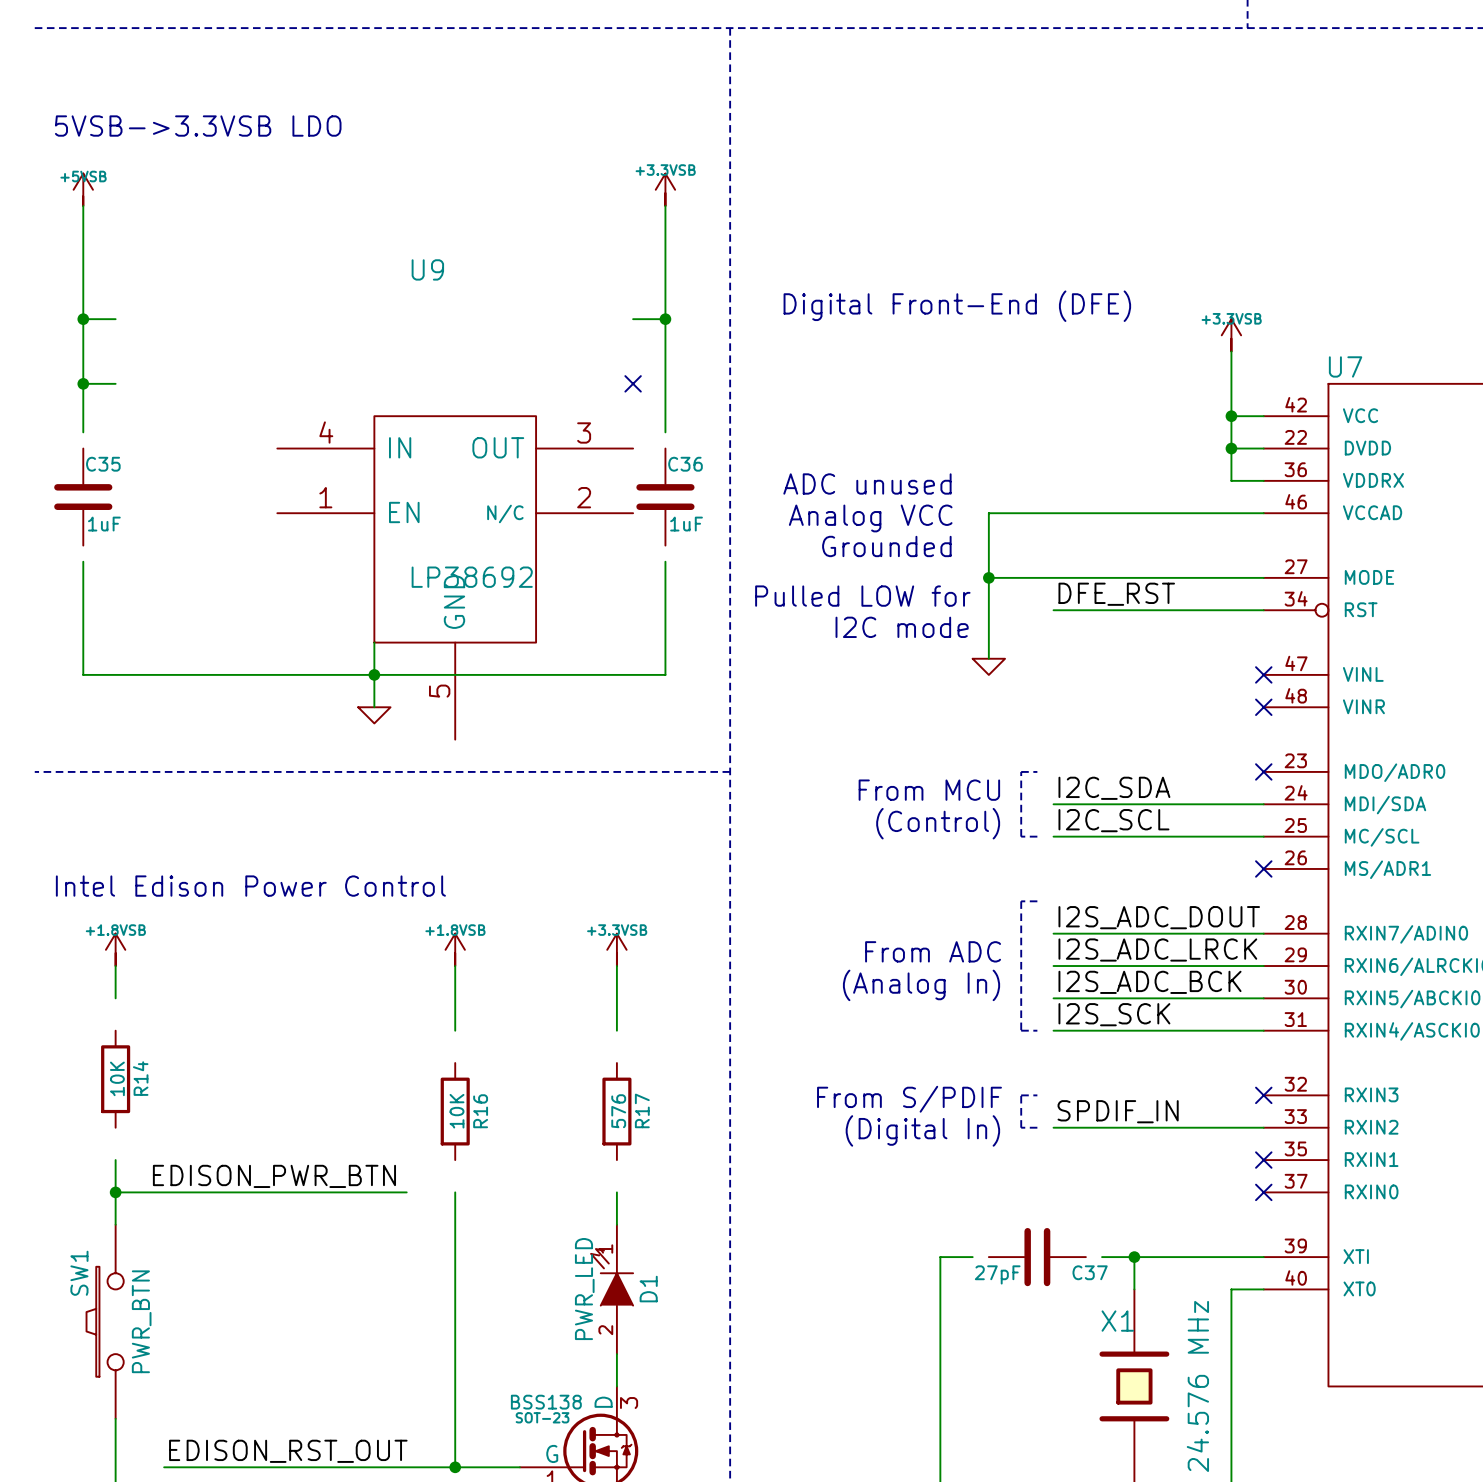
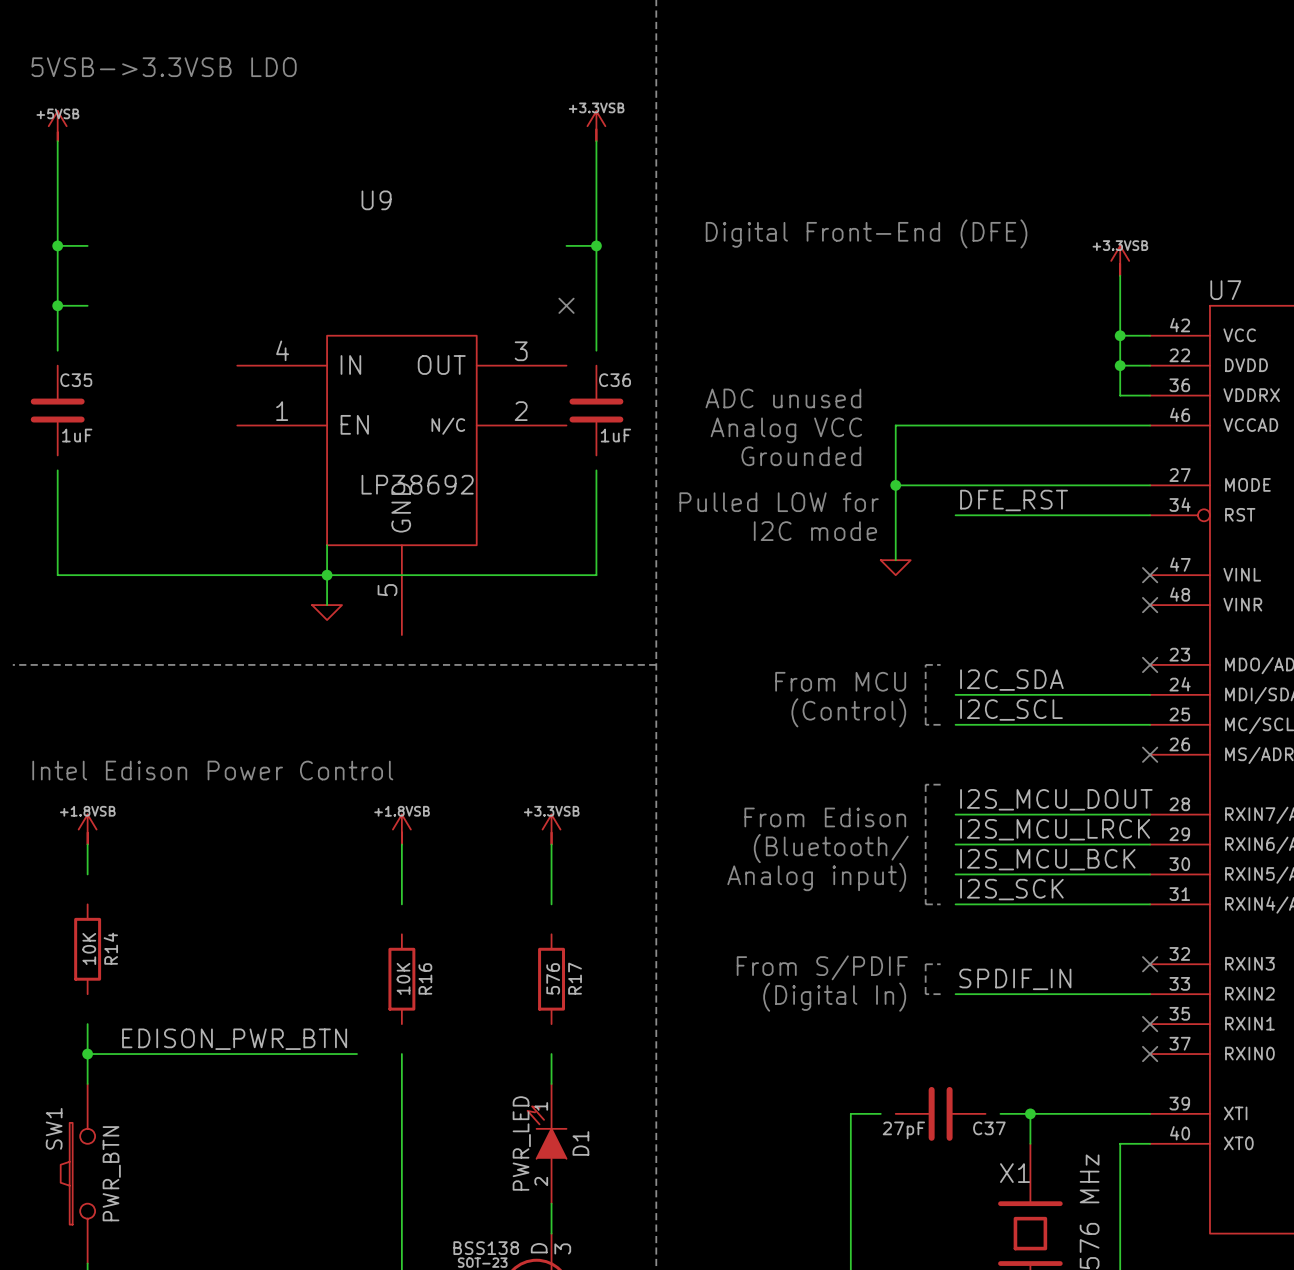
label: I2S_ADC_DOUT (1159, 917) -> I2S_MCU_DOUT (1056, 799)
text: none -> From Edison (825, 817)
label: I2S_ADC_LRCK (1157, 950) -> I2S_MCU_LRCK (1055, 829)
text: From ADC (933, 951) -> none
text: none -> (Bluetooth/ (831, 848)
label: I2S_ADC_BCK (1150, 982) -> I2S_MCU_BCK (1047, 859)
text: (Analog In) (921, 985) -> Analog input) (816, 877)

